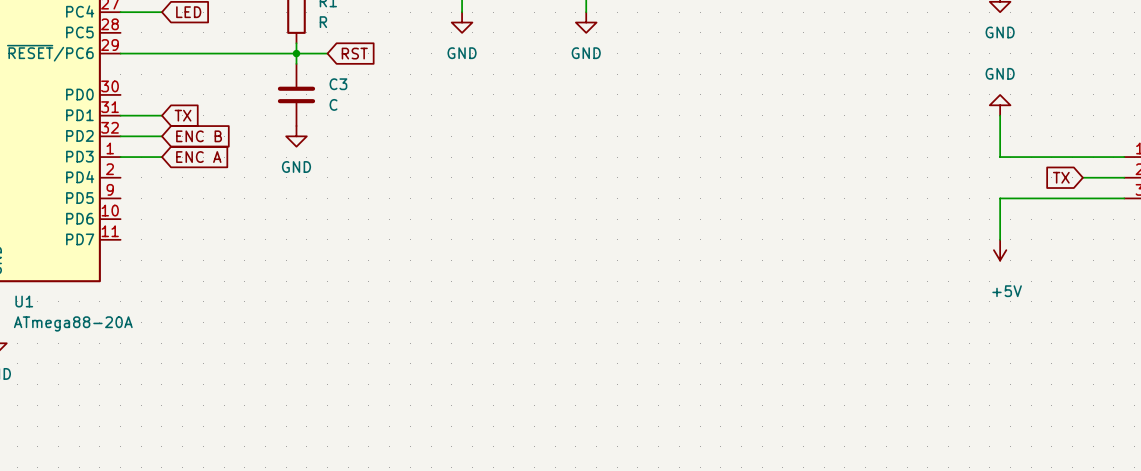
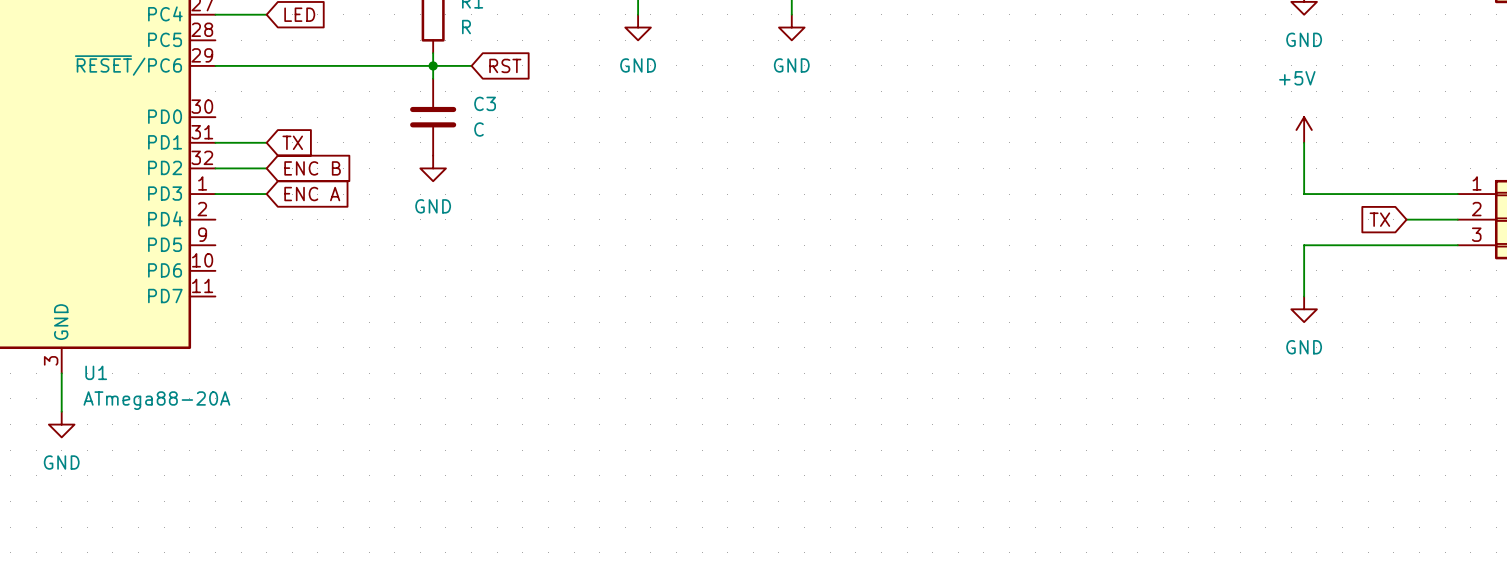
power symbol: GND (1000, 105) -> +5V (1304, 129)
power symbol: +5V (1000, 250) -> GND (1304, 309)

